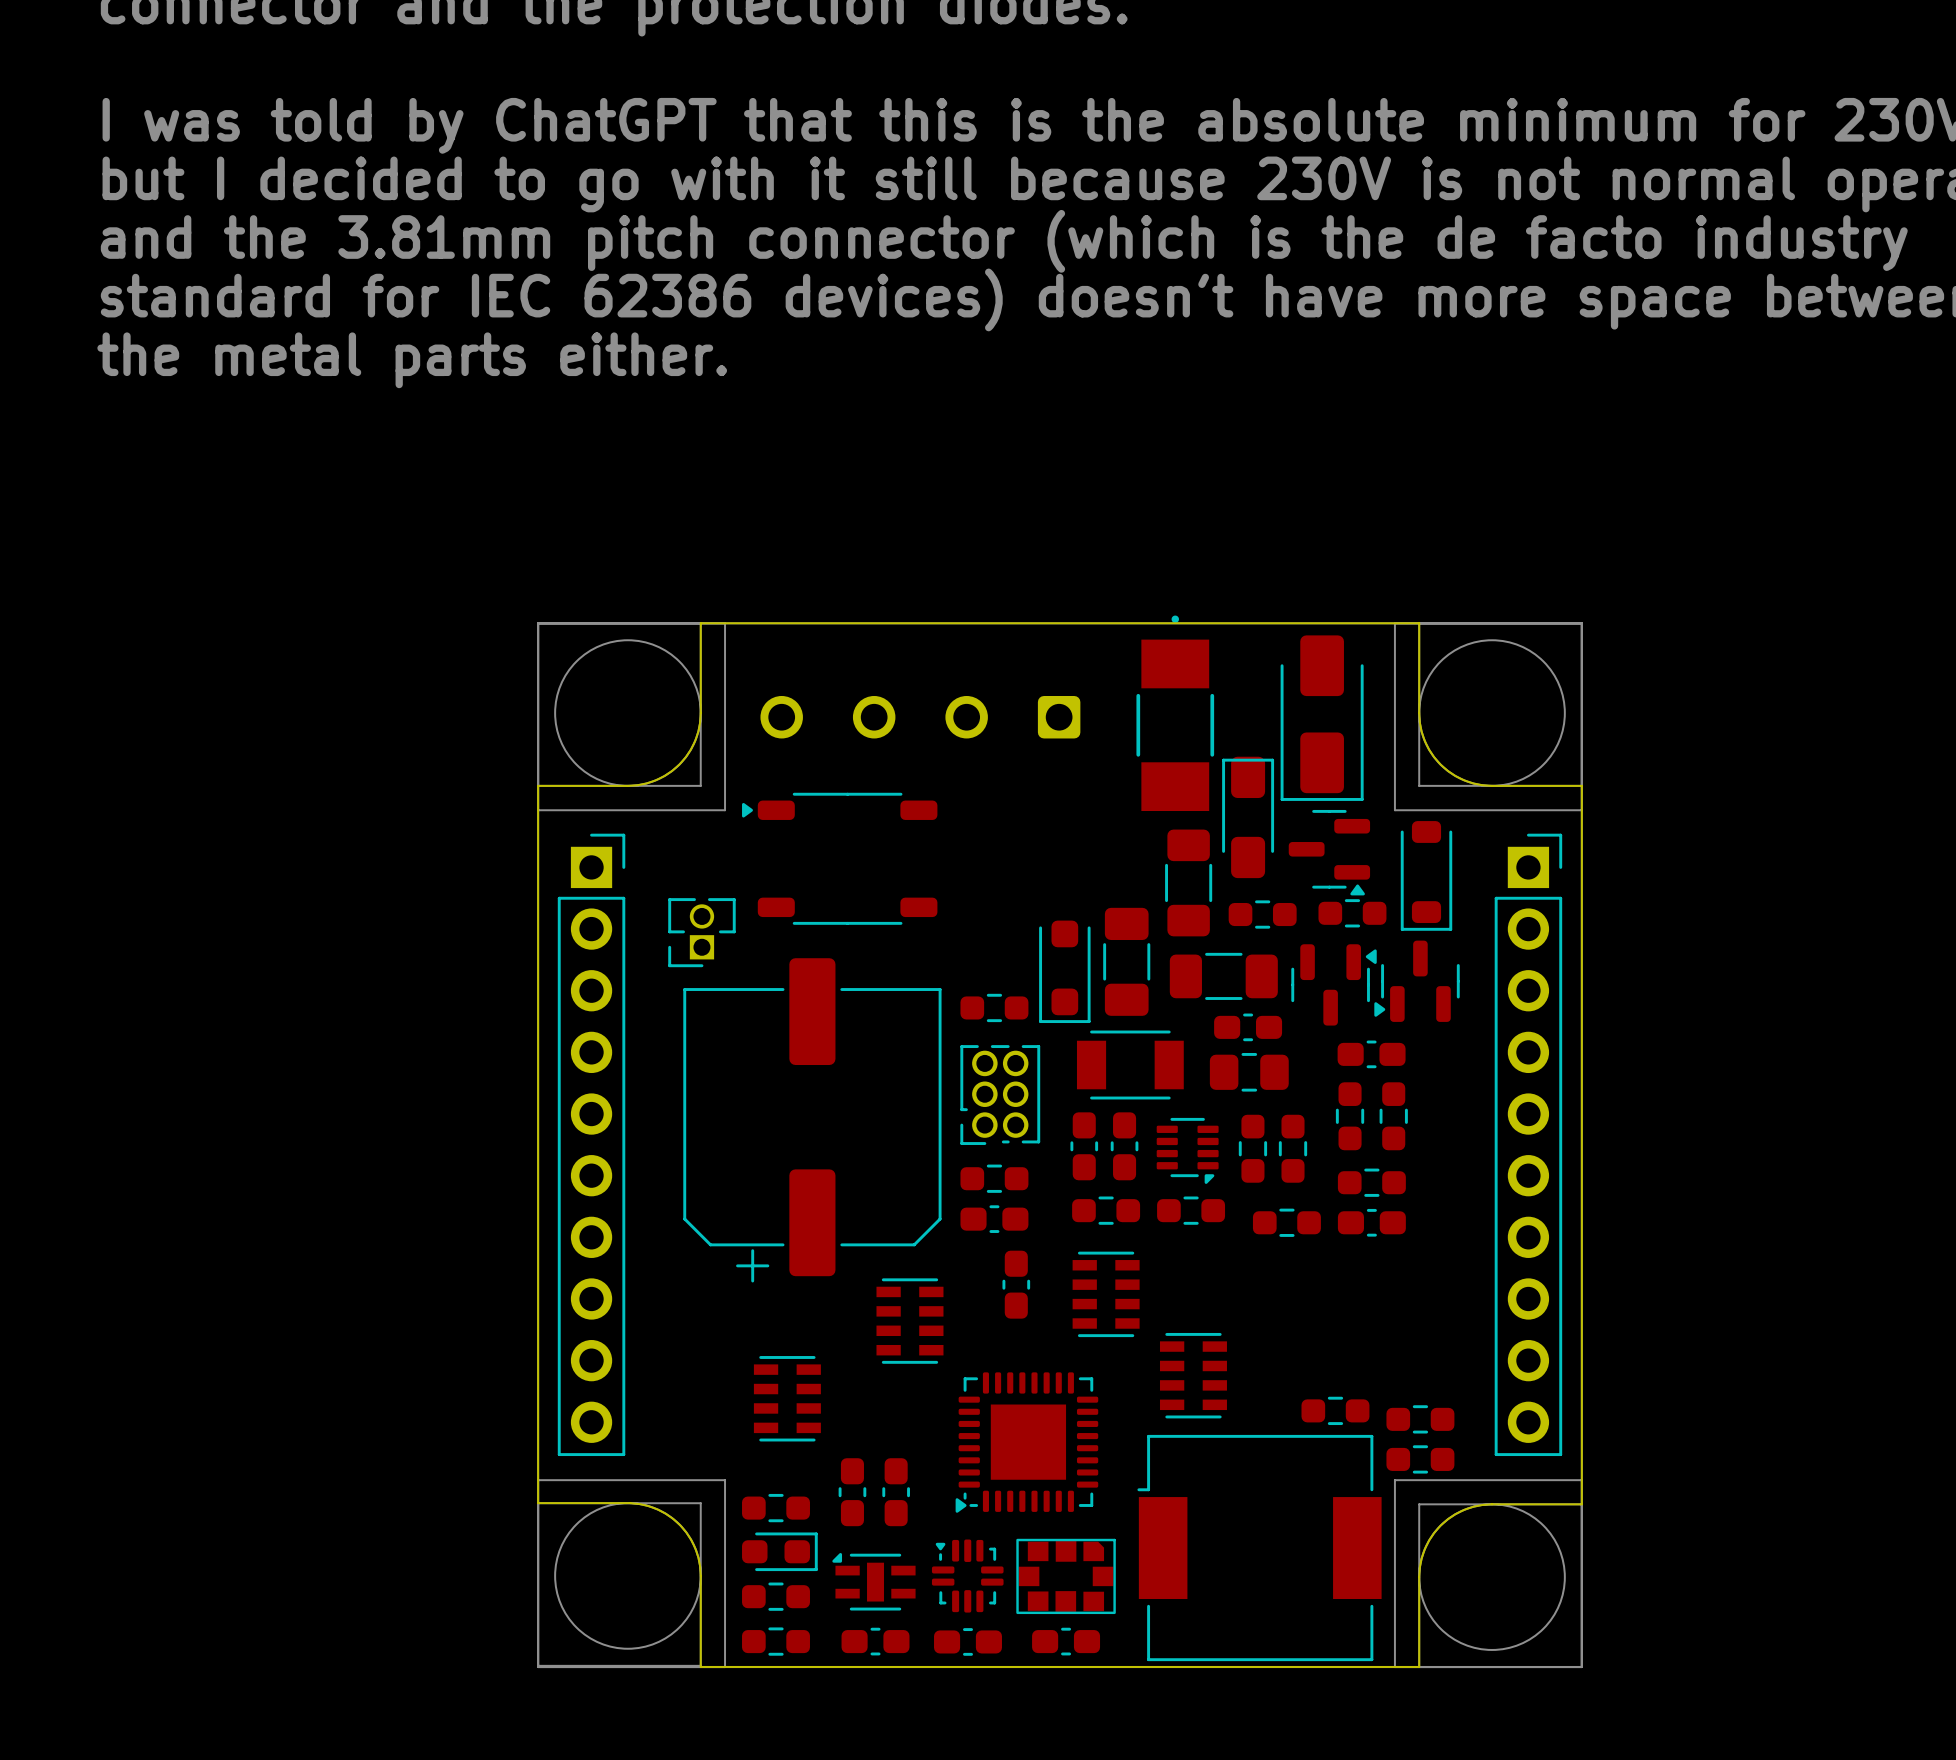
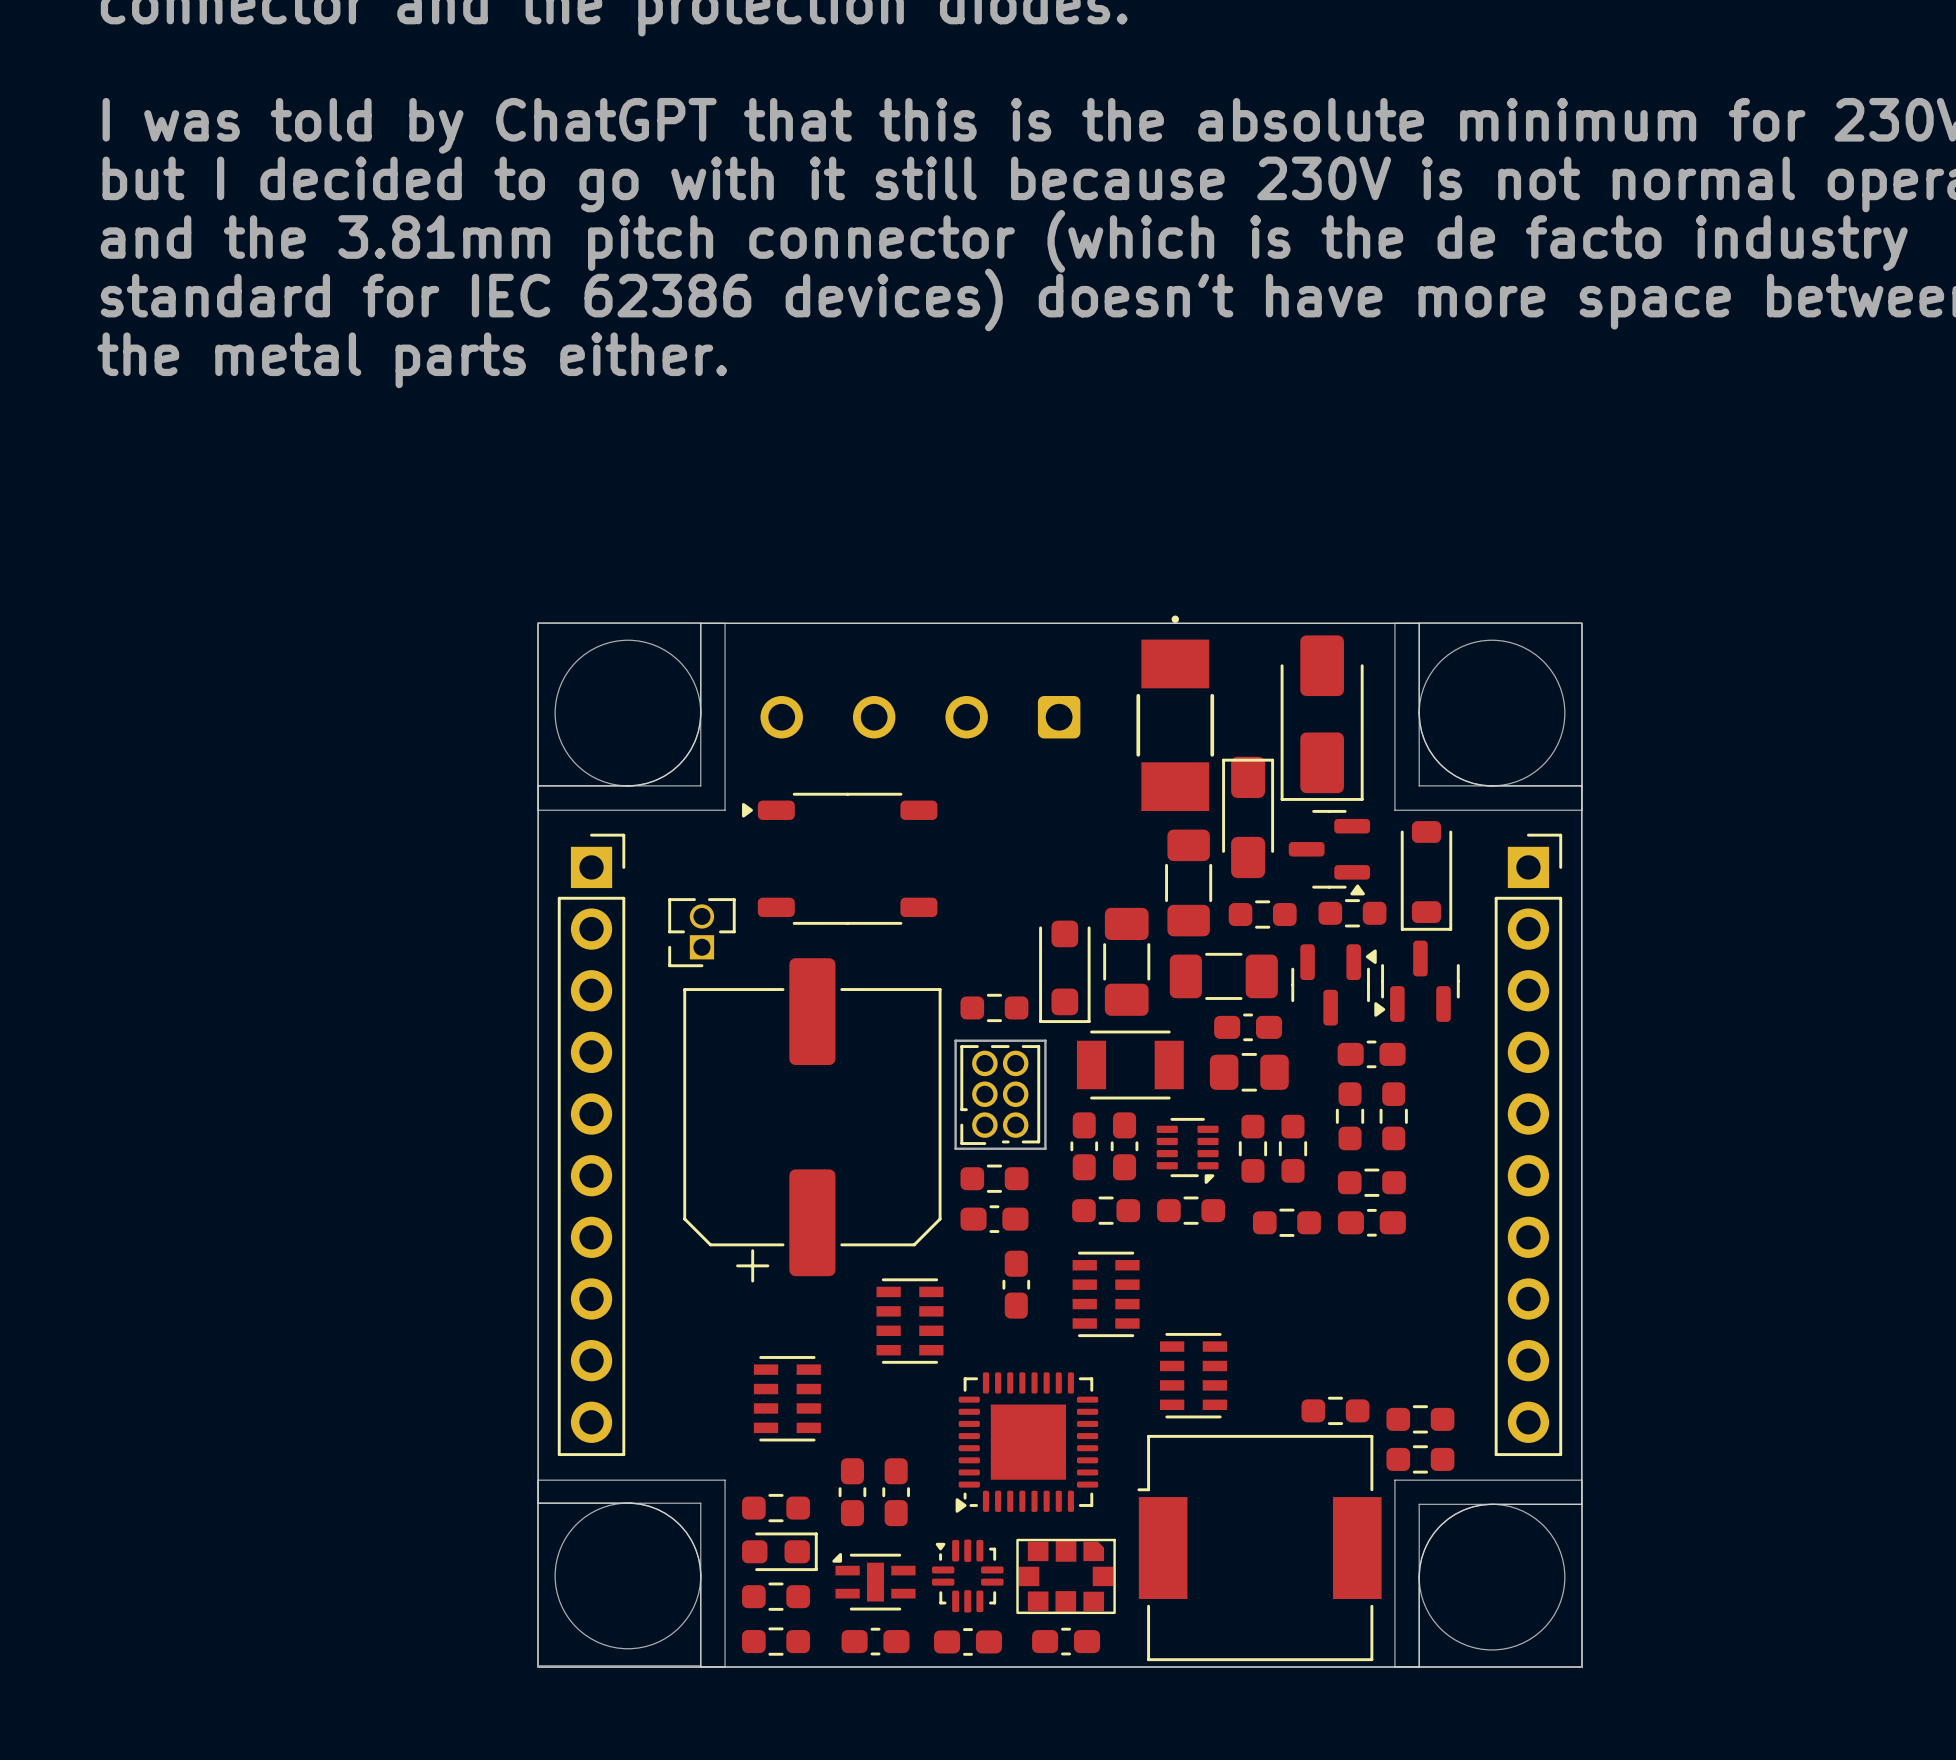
line: none -> (955, 1040) (1045, 1040) (1045, 1148) (955, 1148) (955, 1040)

